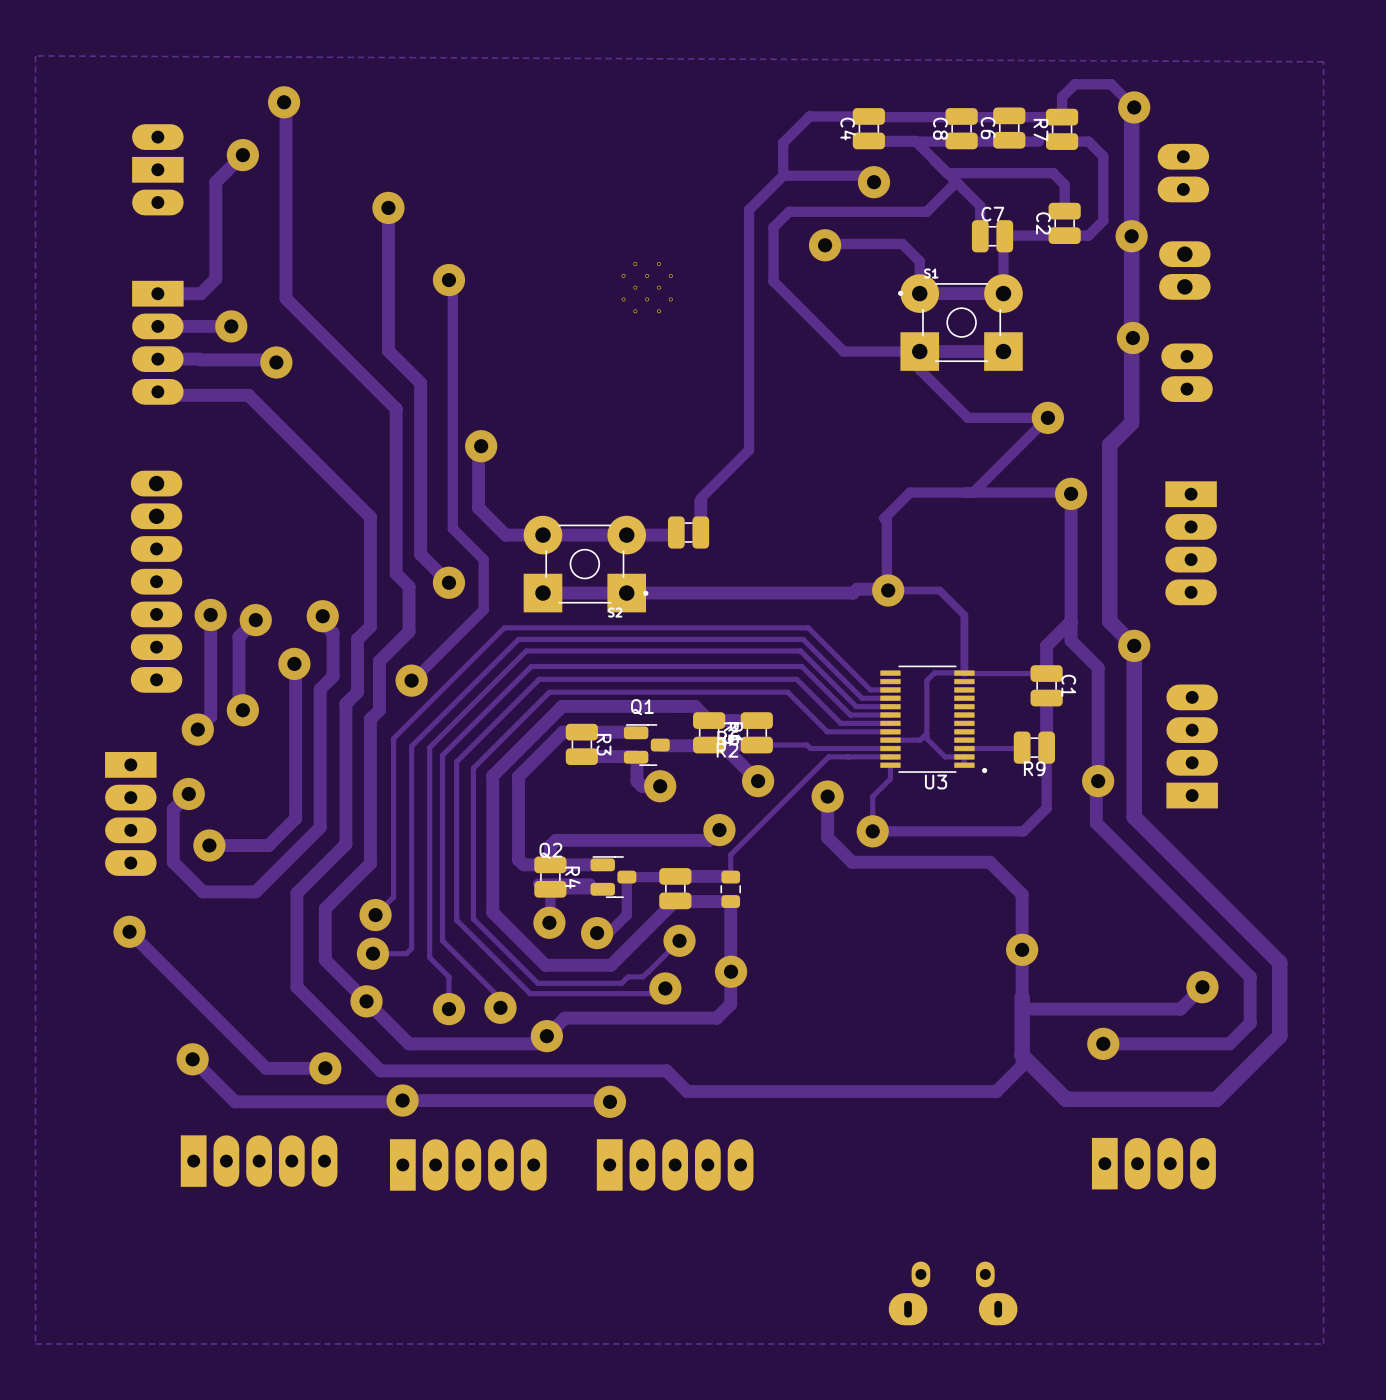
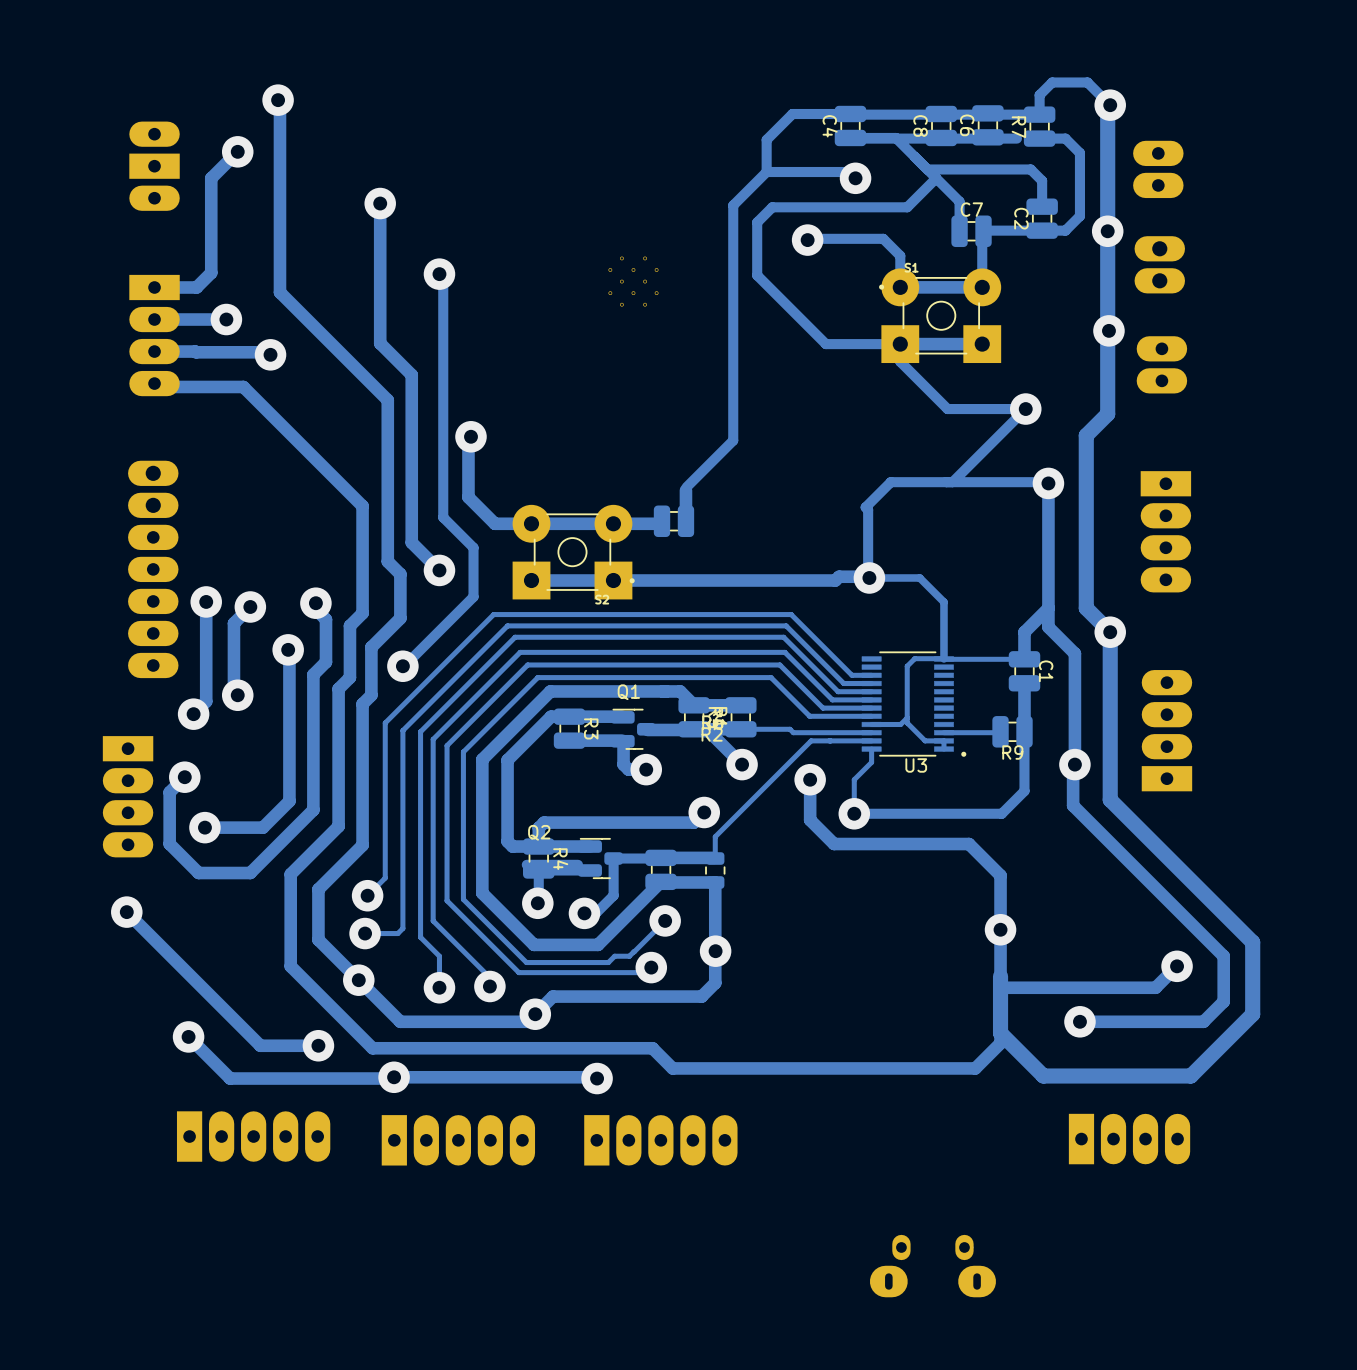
zone outline: (35, 55) (1323, 61) (1323, 1343) (35, 1343) (35, 55) -> none

